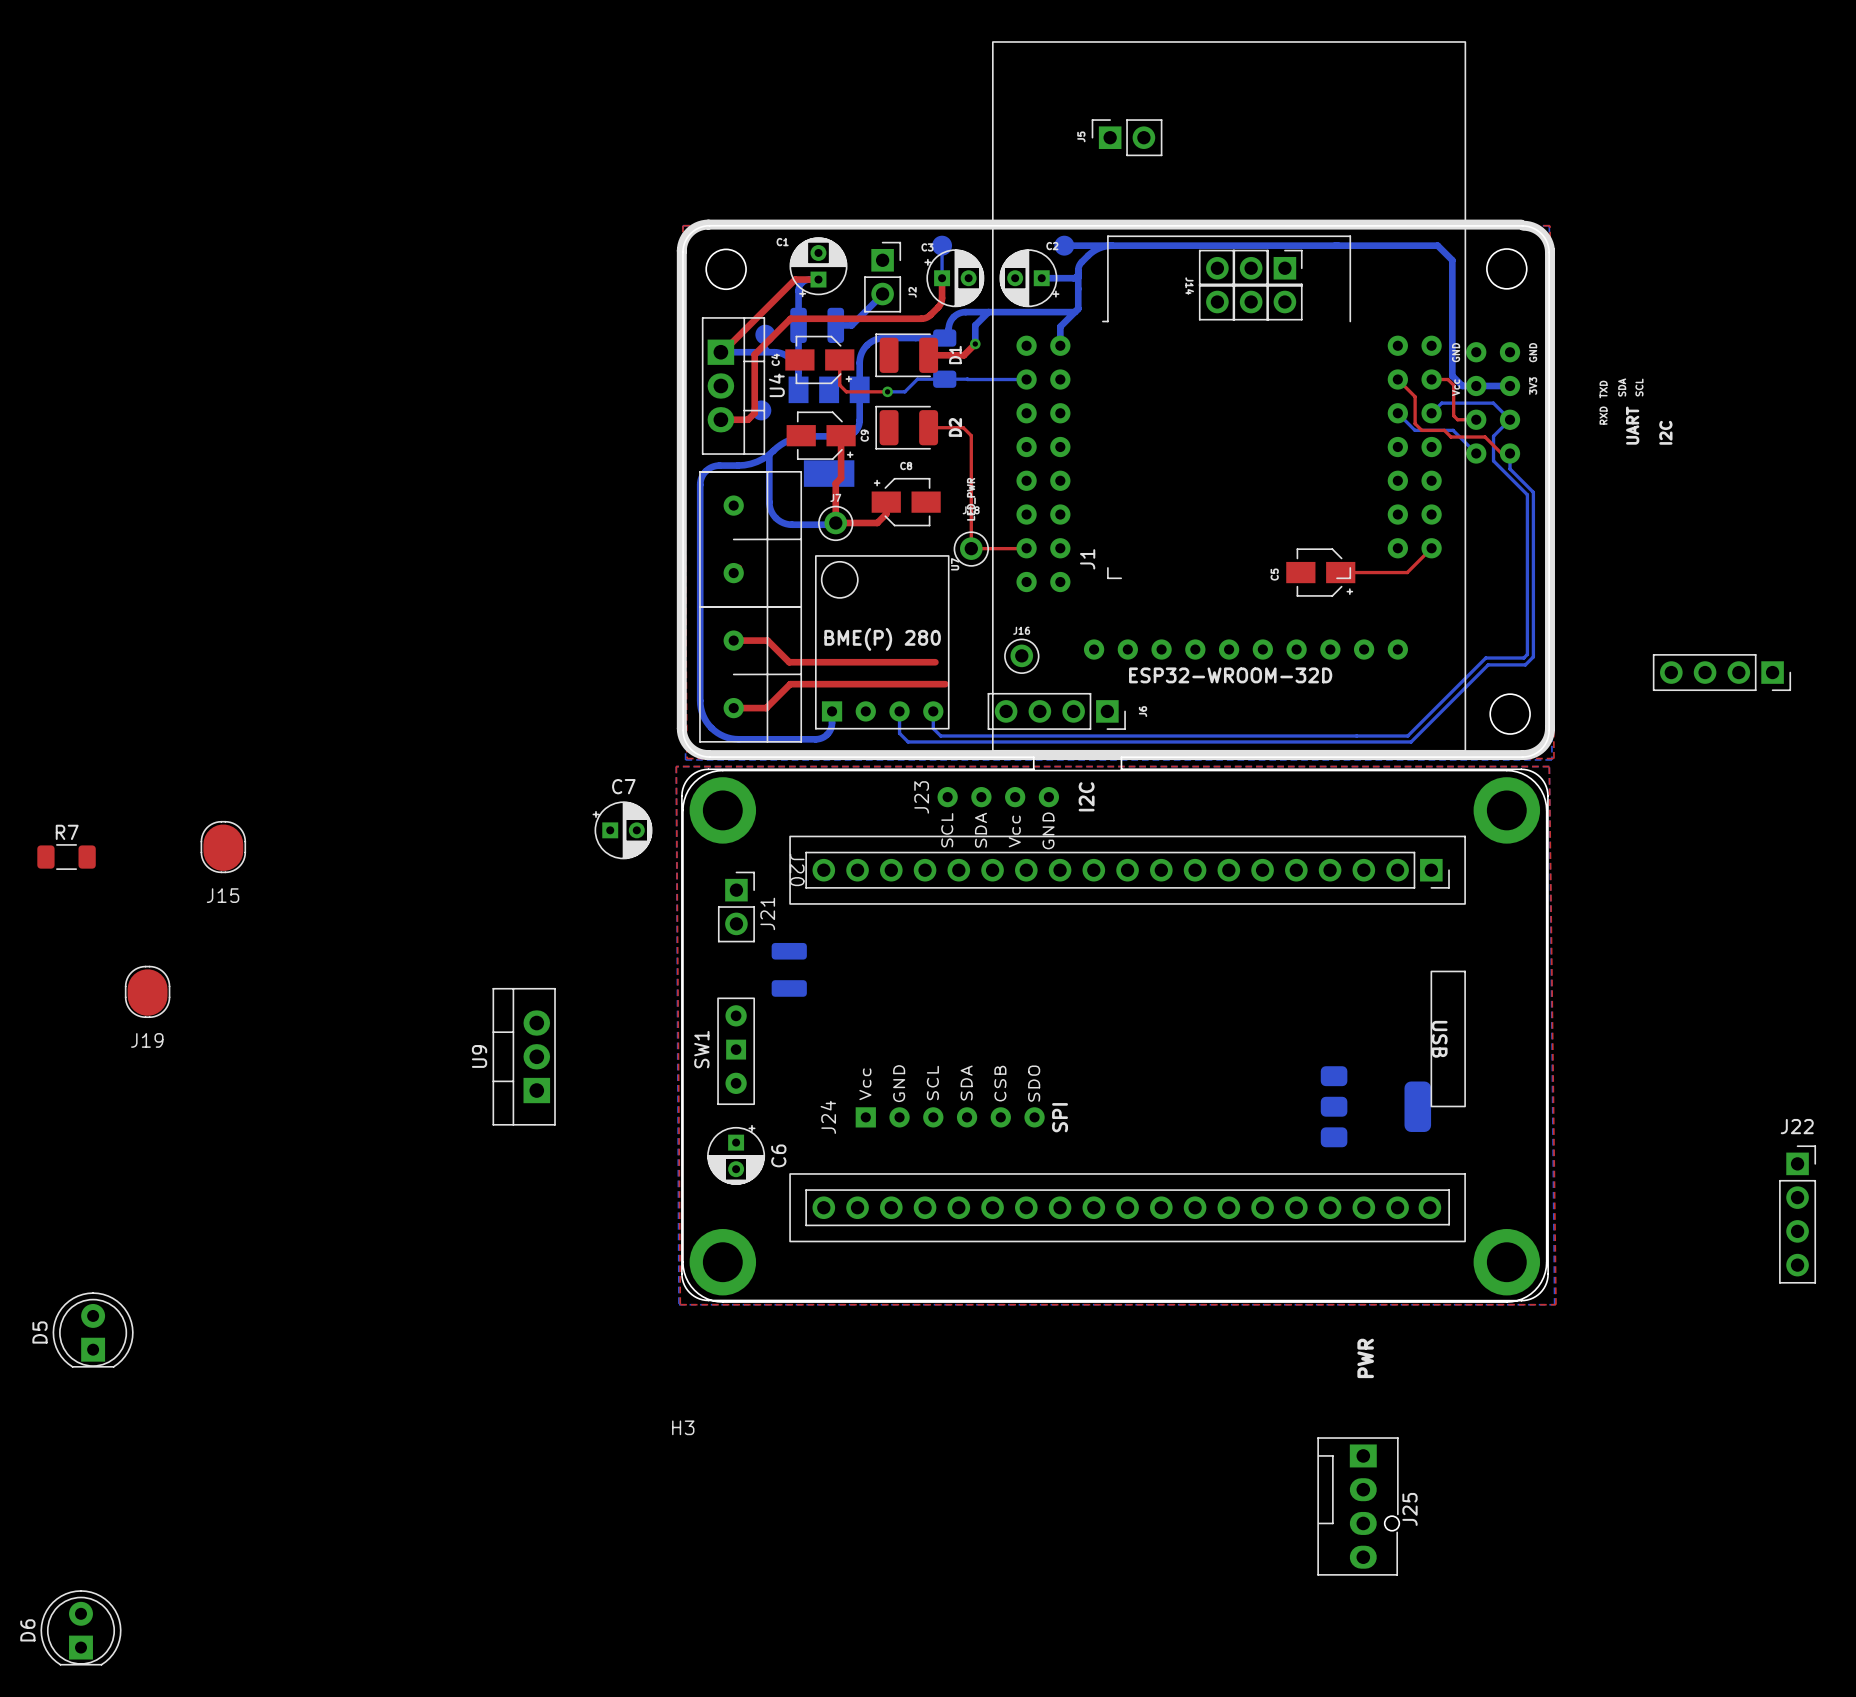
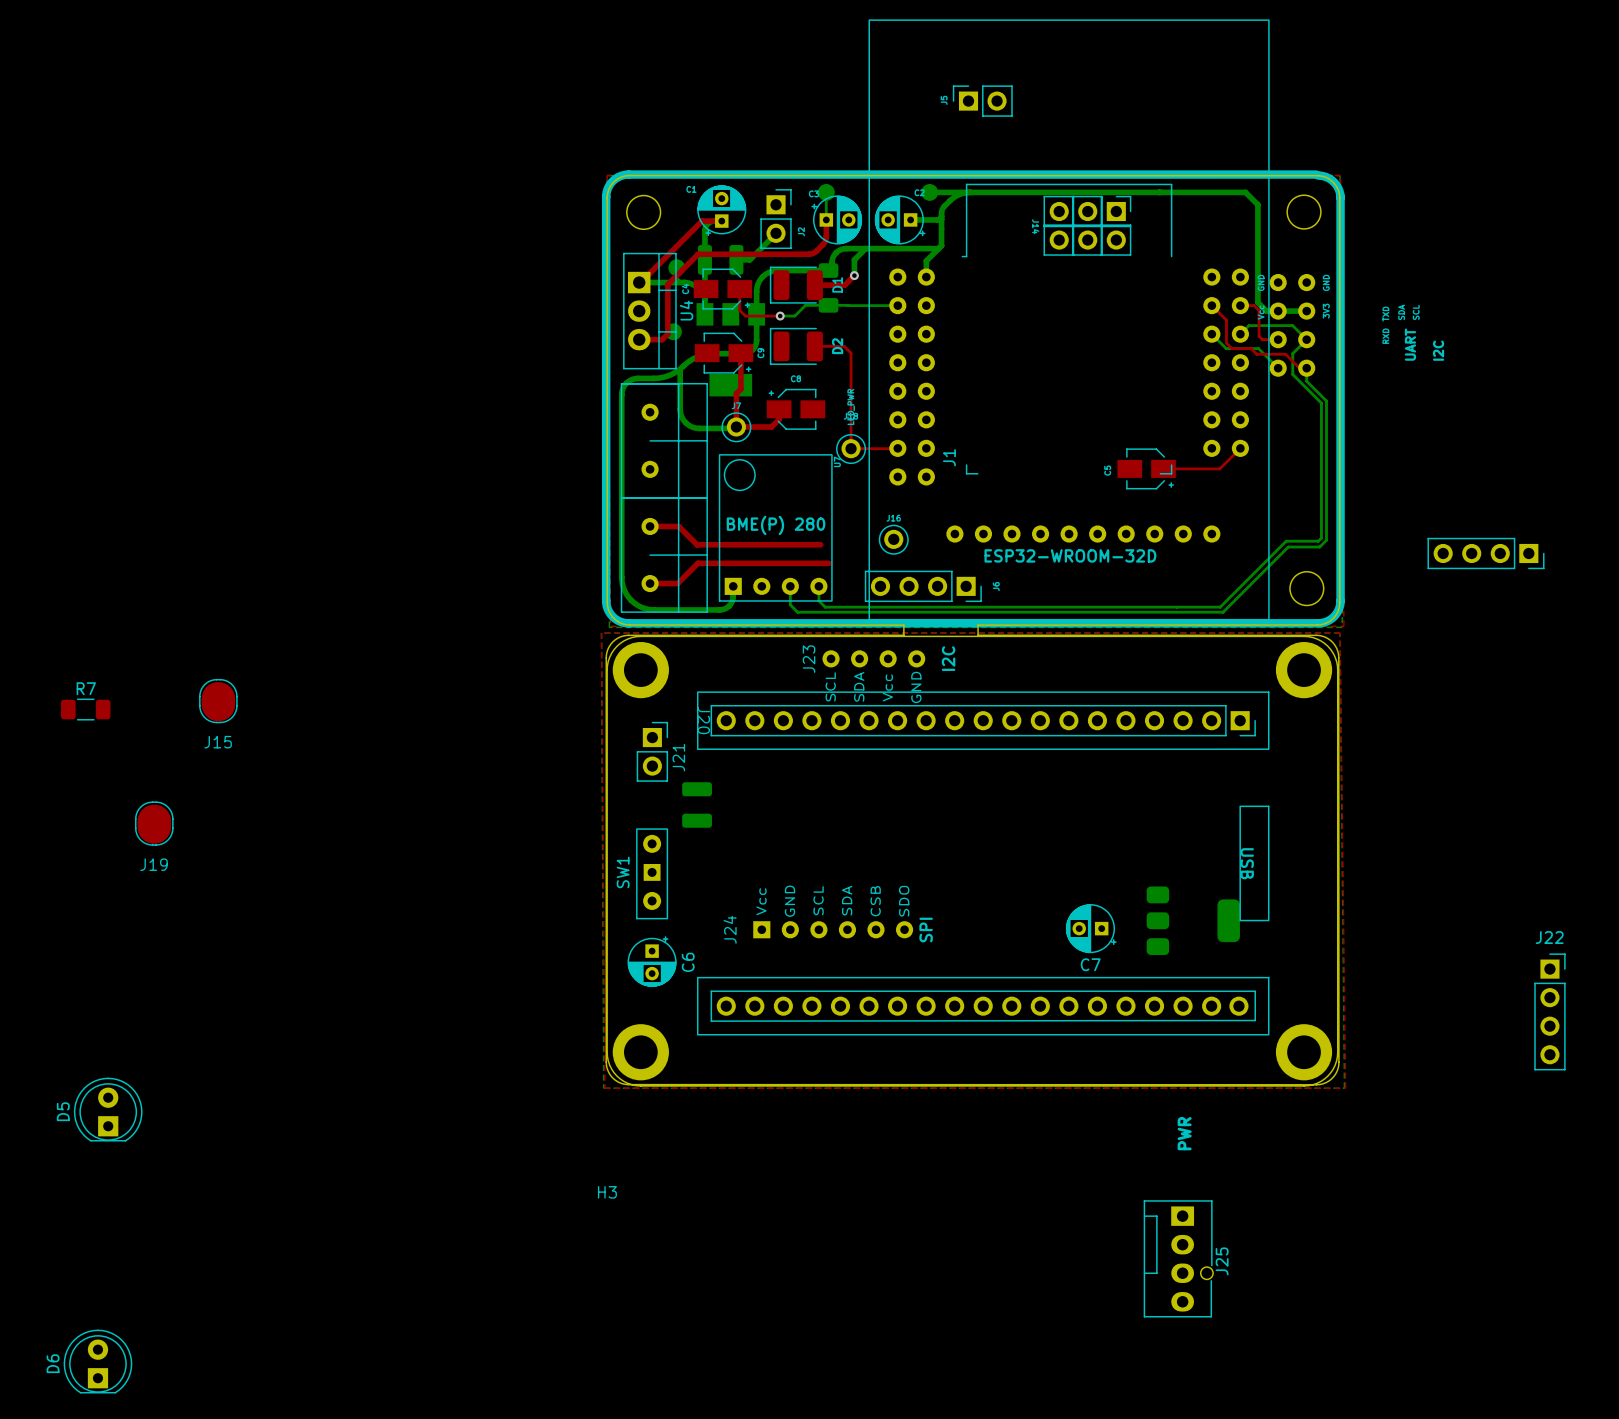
C7 rotation: 0° (622, 830) -> 180° (1091, 928)
C7 position: (622, 830) -> (1091, 928)
U9: (524, 1056) -> none

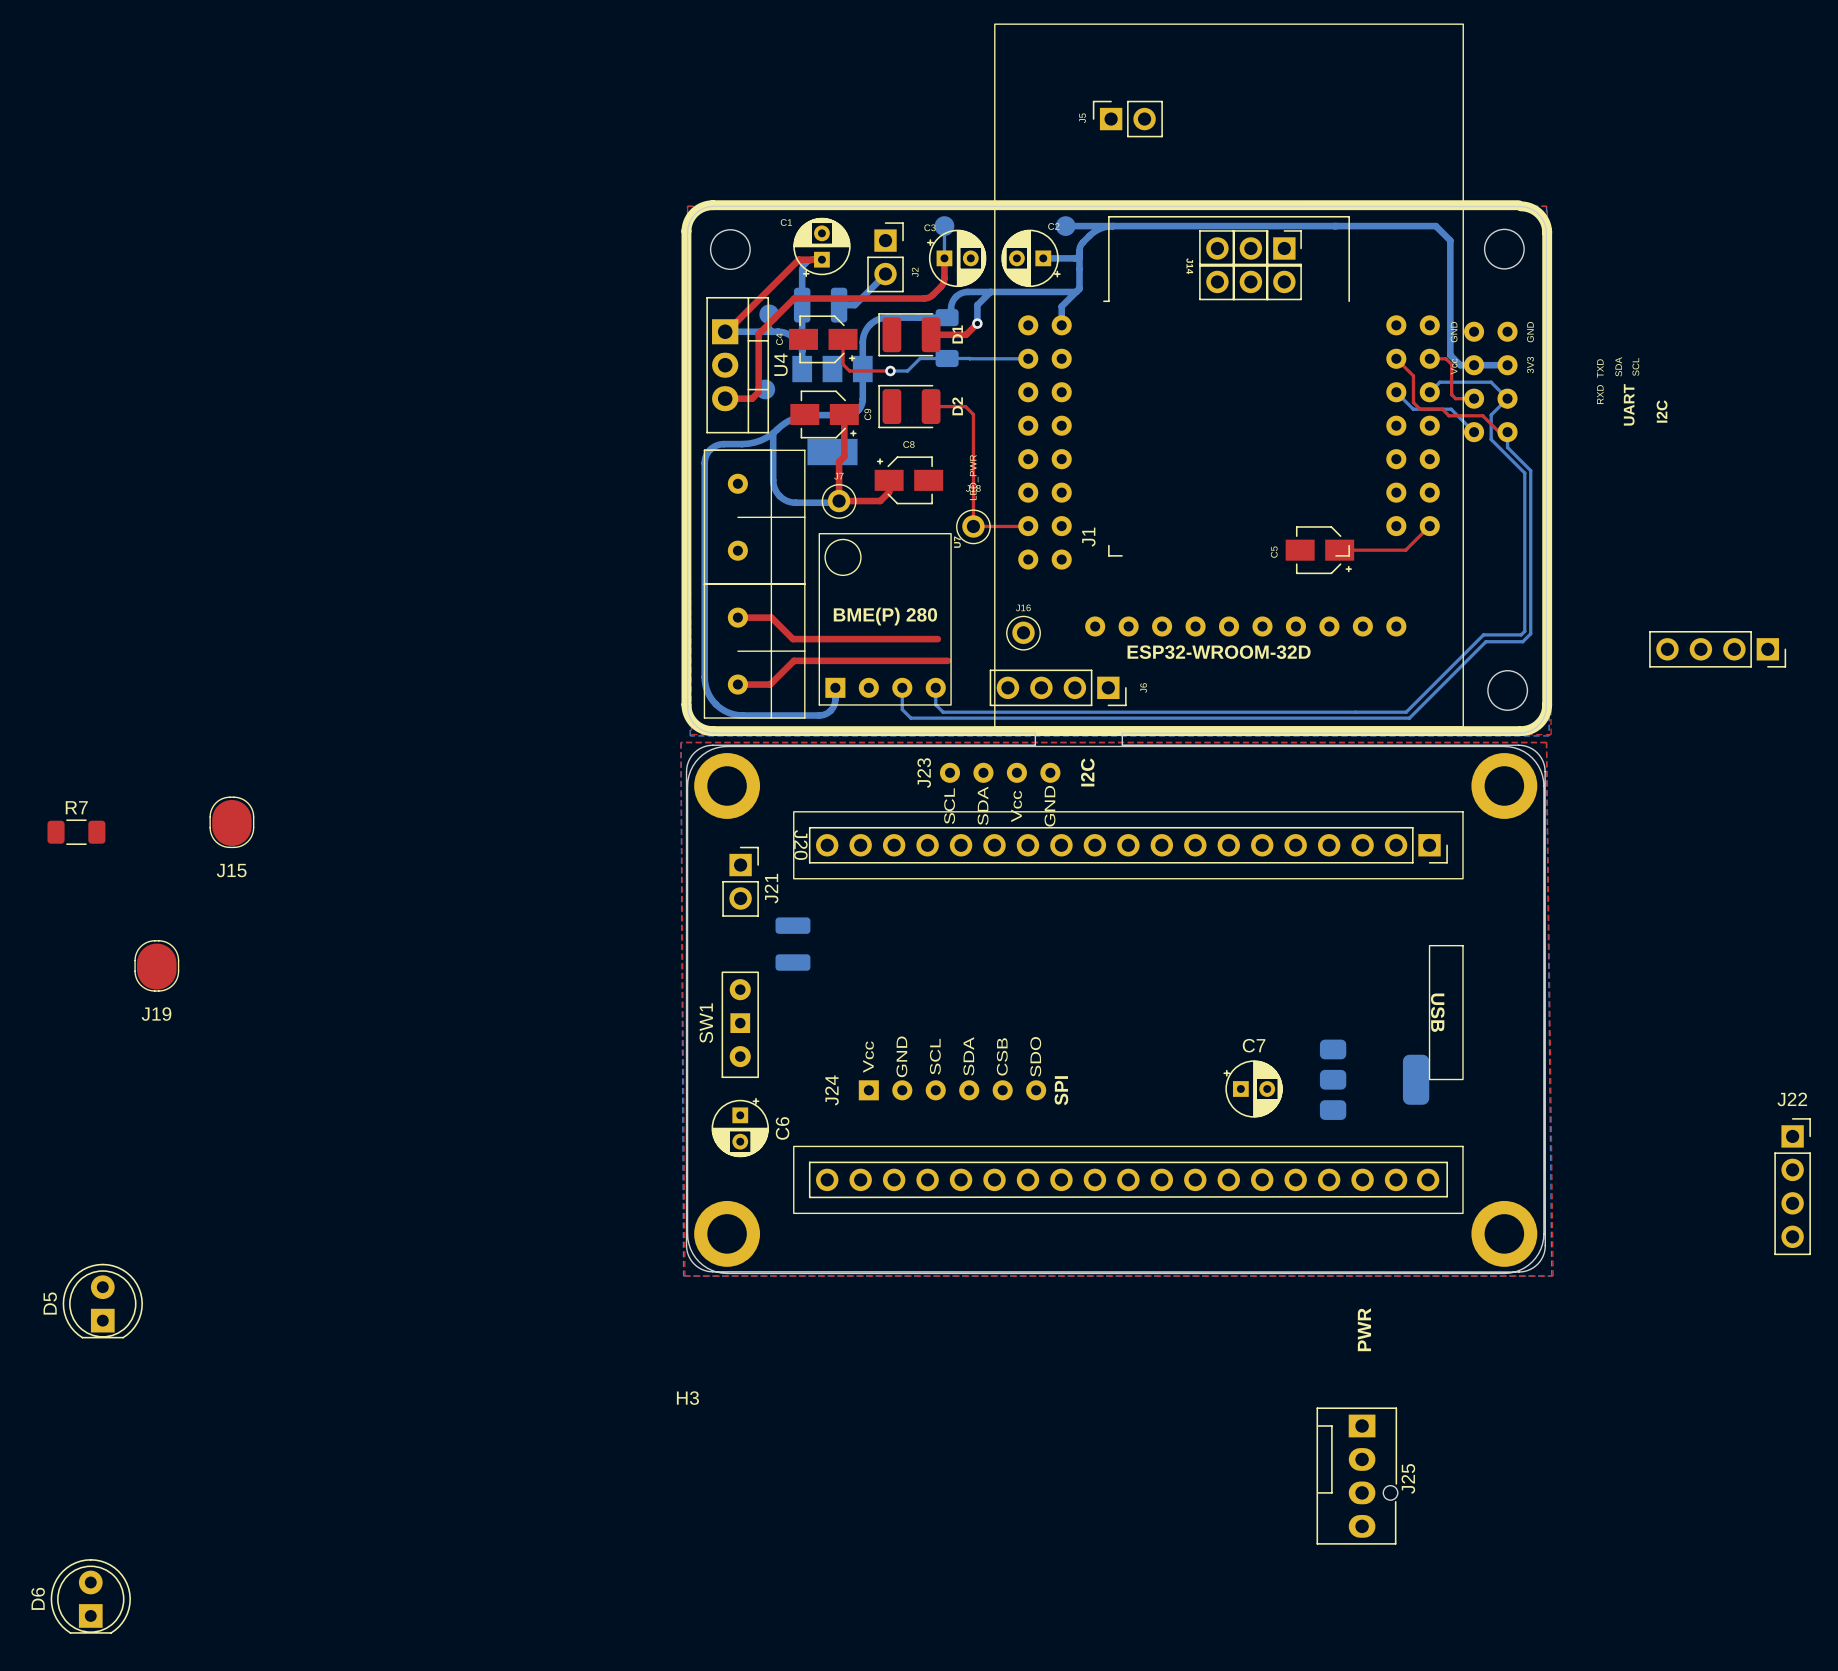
C7 rotation: 0° (1091, 928) -> 180° (1253, 1088)

